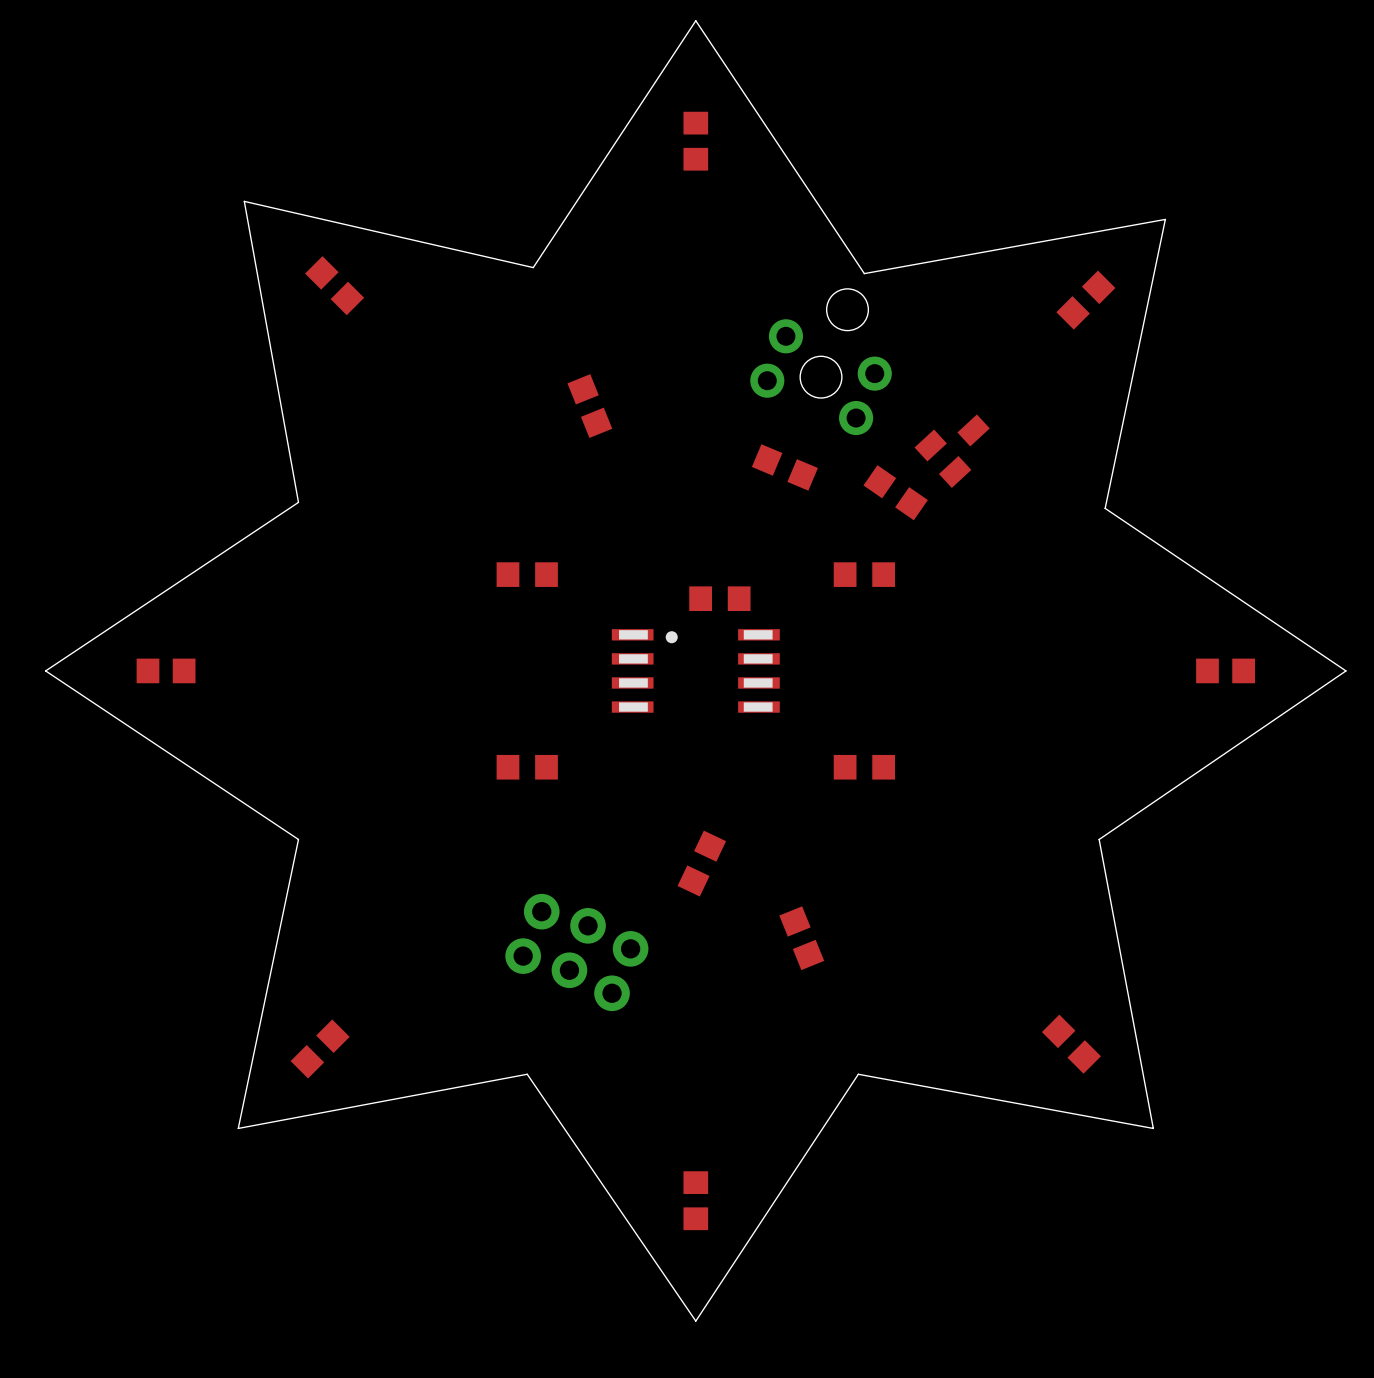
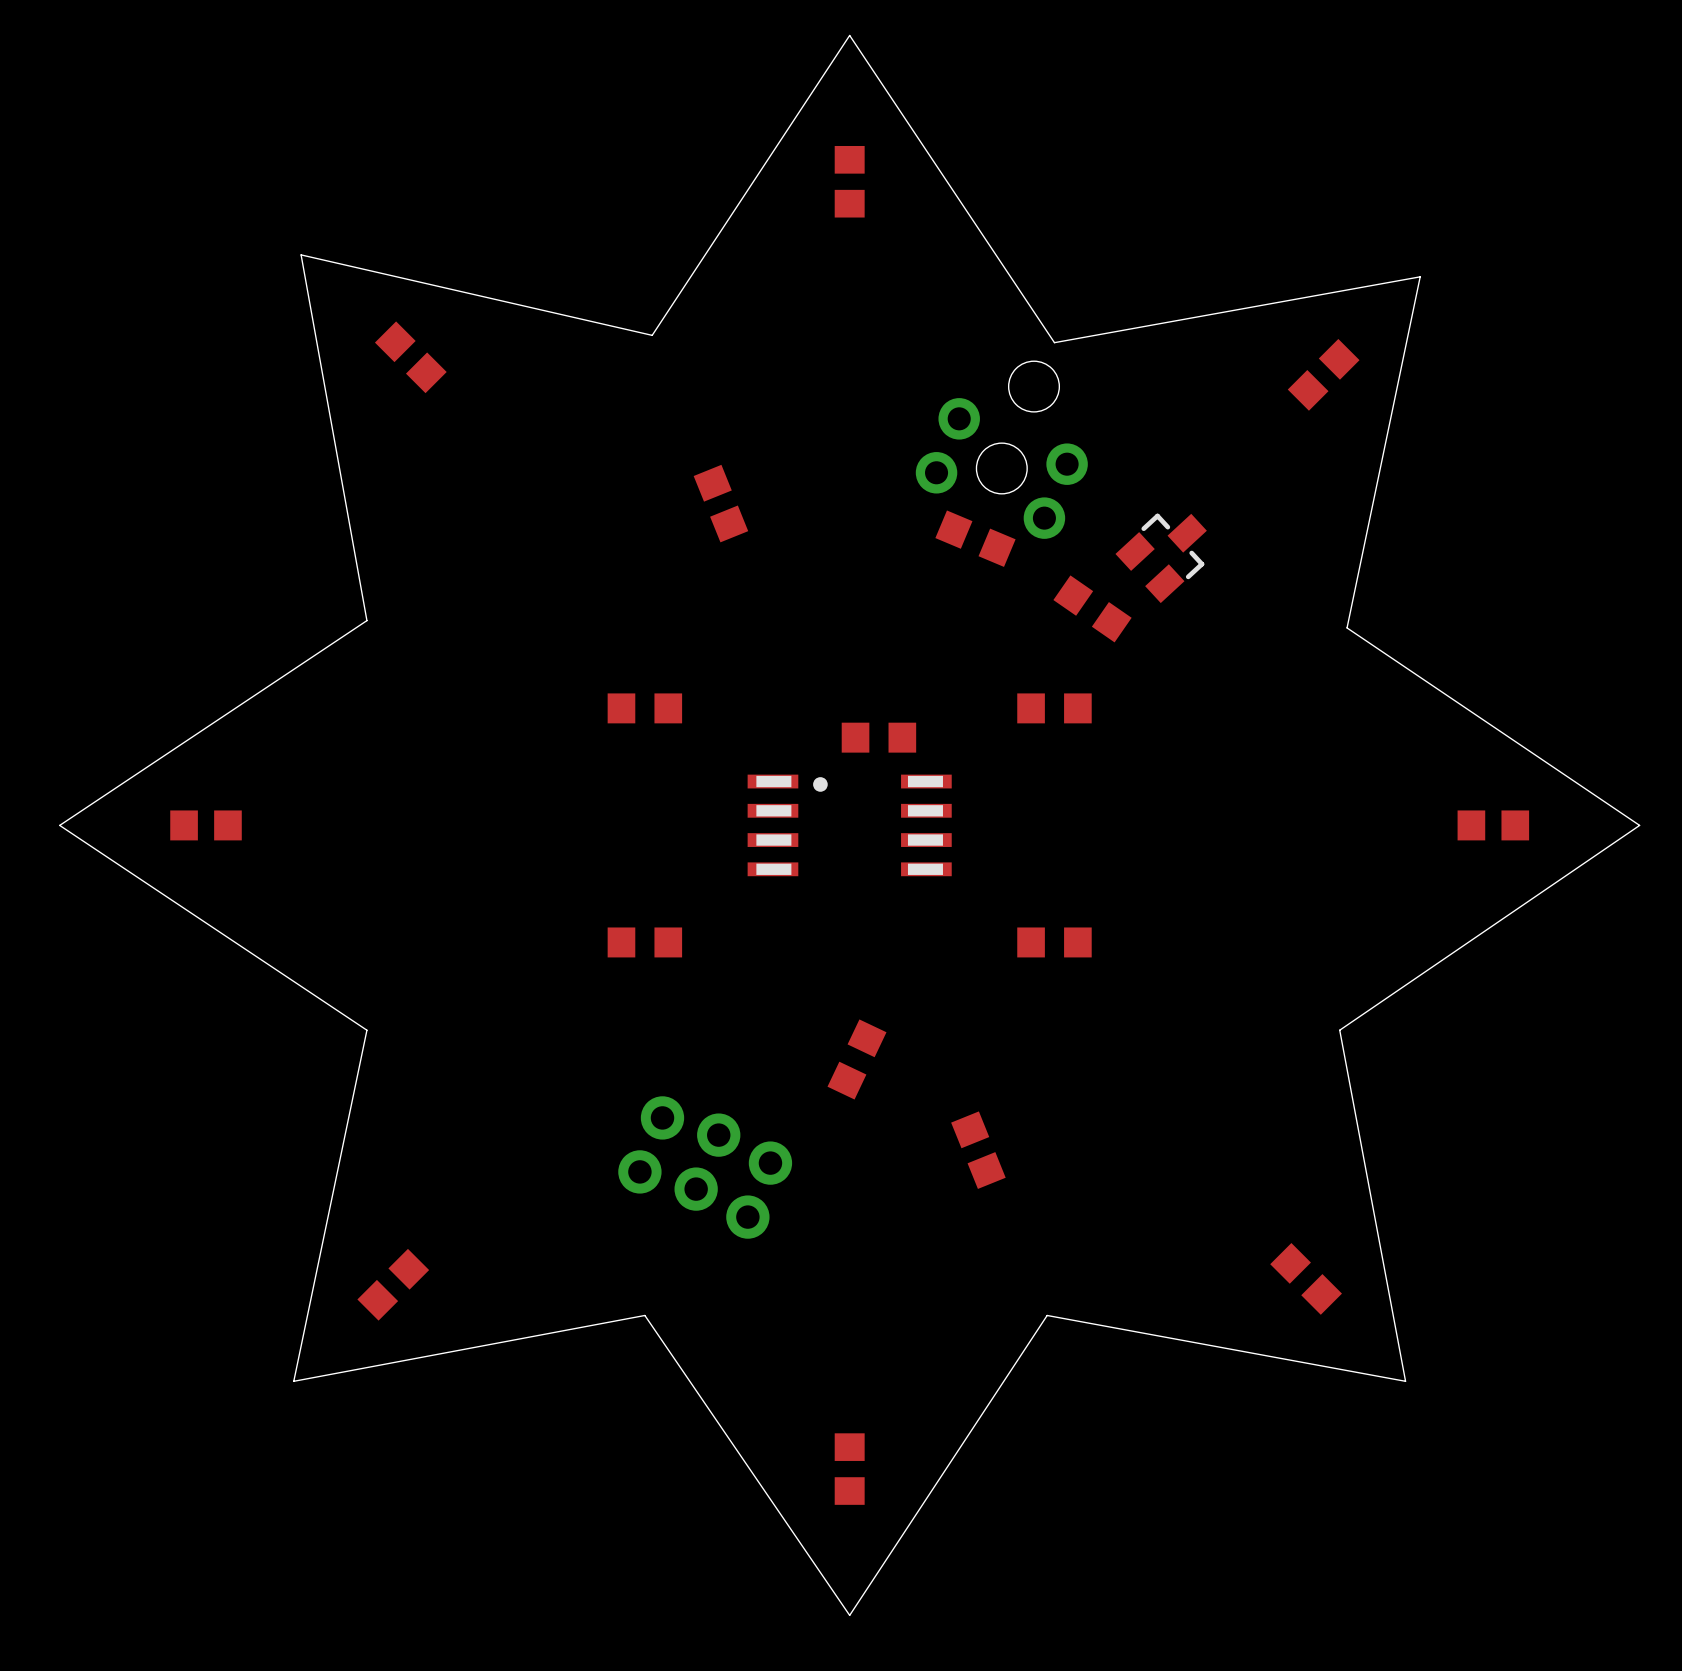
part footprint: [914, 414, 990, 488] -> [1115, 513, 1207, 604]
part position: (784, 467) -> (975, 538)

